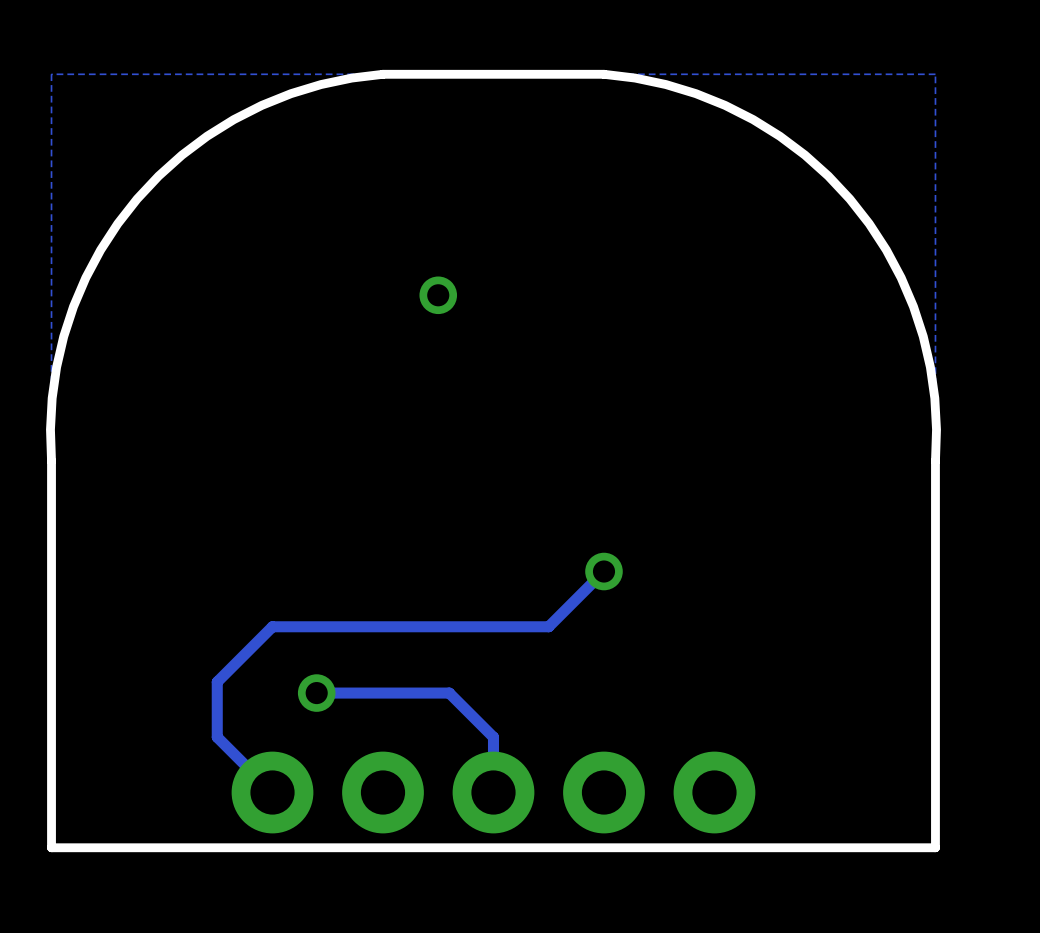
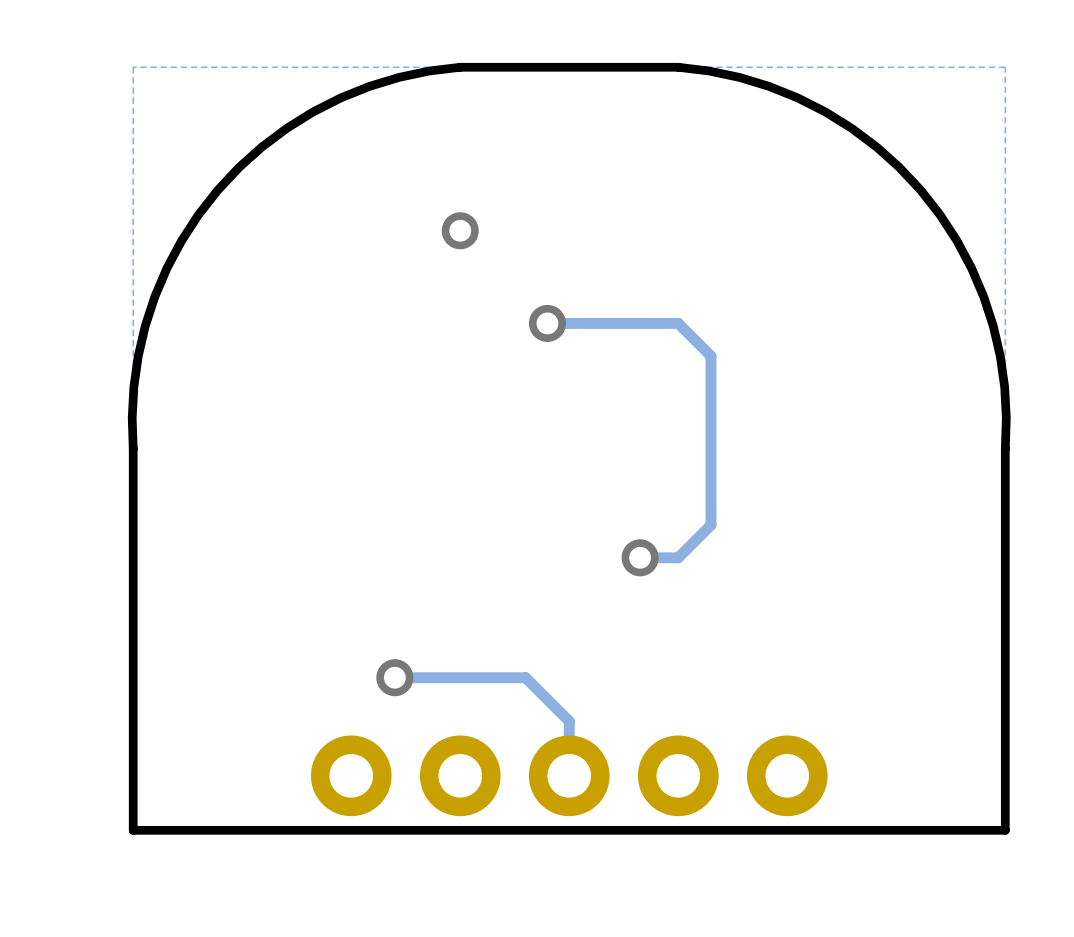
via: none -> (460, 230)
via: (438, 295) -> none
track: none -> (547, 323) (678, 323) (710, 356) (710, 525) (678, 557) (640, 557)
via: none -> (547, 323)
track: (603, 571) (548, 626) (272, 626) (217, 682) (217, 737) (272, 792) -> none
via position: (603, 571) -> (640, 557)

